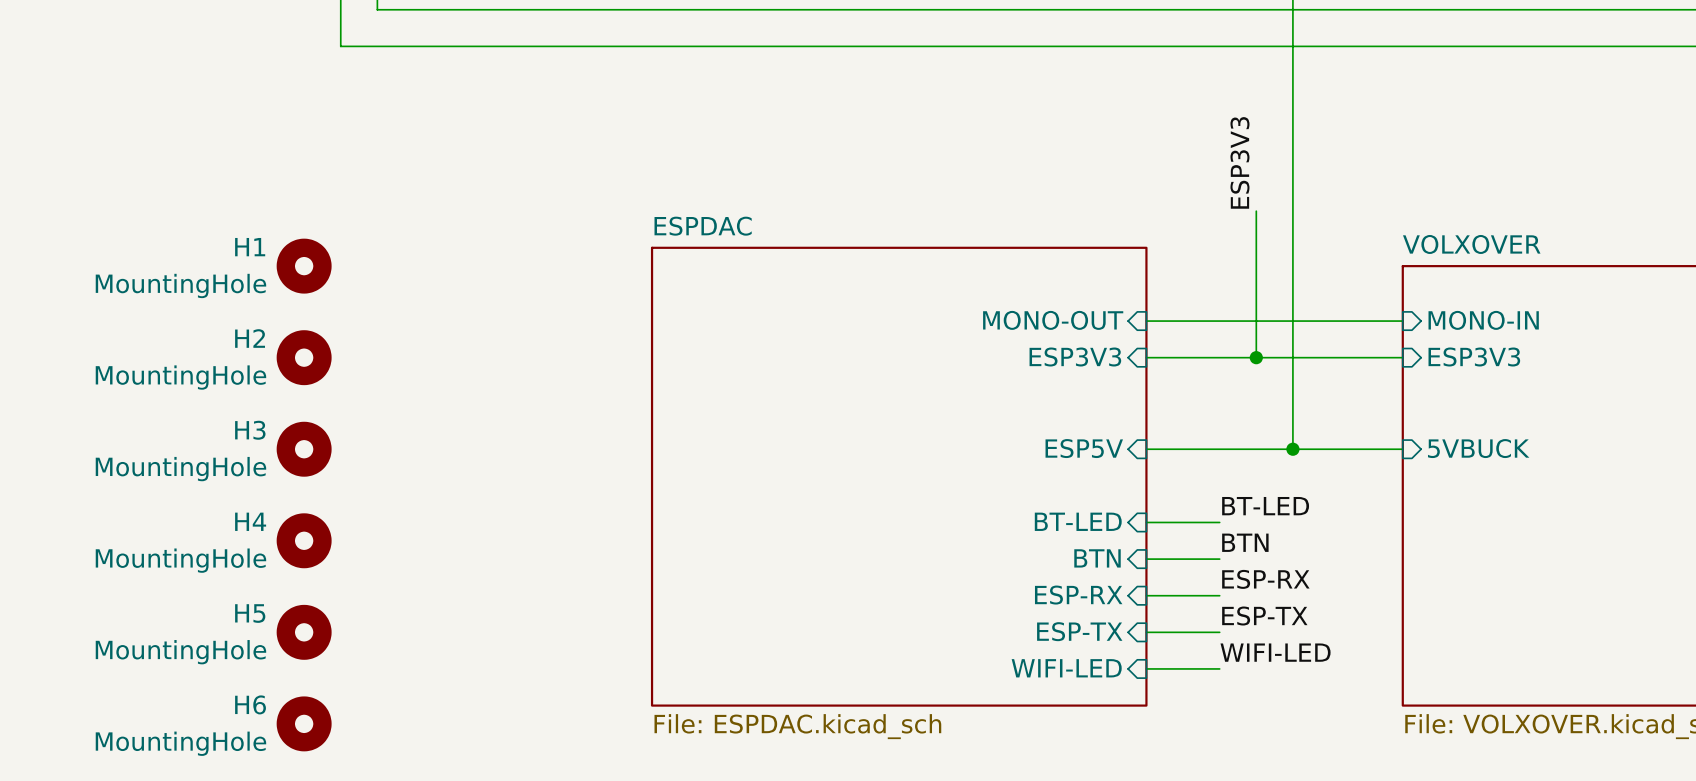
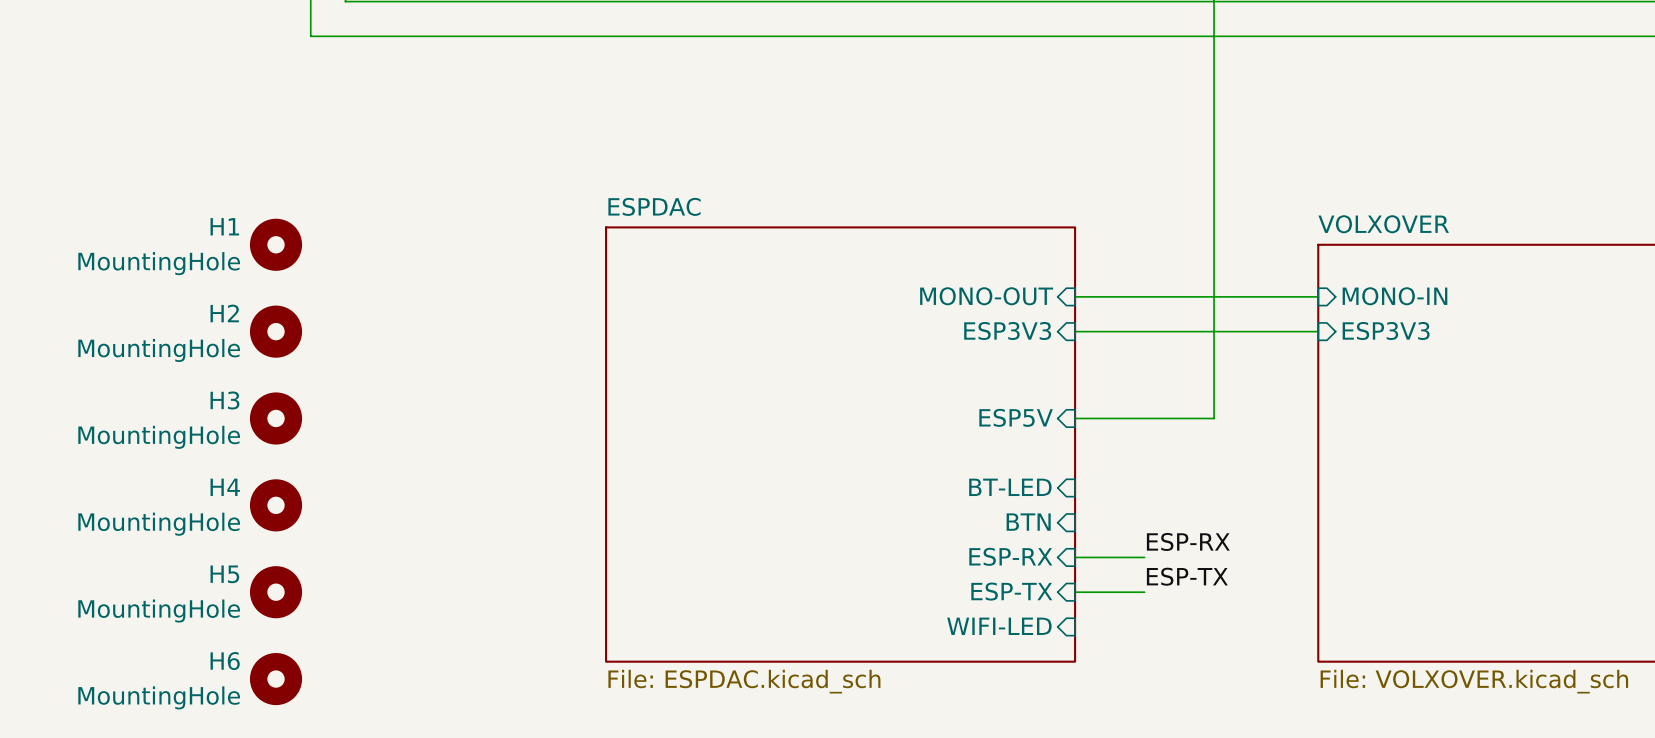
label: ESP3V3 (1239, 162) -> none
wire: (1256, 211) (1256, 357) -> none
junction: (1256, 357) -> none
sheet pin: 5VBUCK (1478, 448) -> none
wire: (1292, 449) (1402, 449) -> none
junction: (1292, 449) -> none
label: BT-LED (1265, 506) -> none
wire: (1146, 522) (1219, 522) -> none
label: BTN (1245, 542) -> none
wire: (1146, 559) (1219, 559) -> none
label: WIFI-LED (1275, 652) -> none
wire: (1146, 668) (1219, 668) -> none

